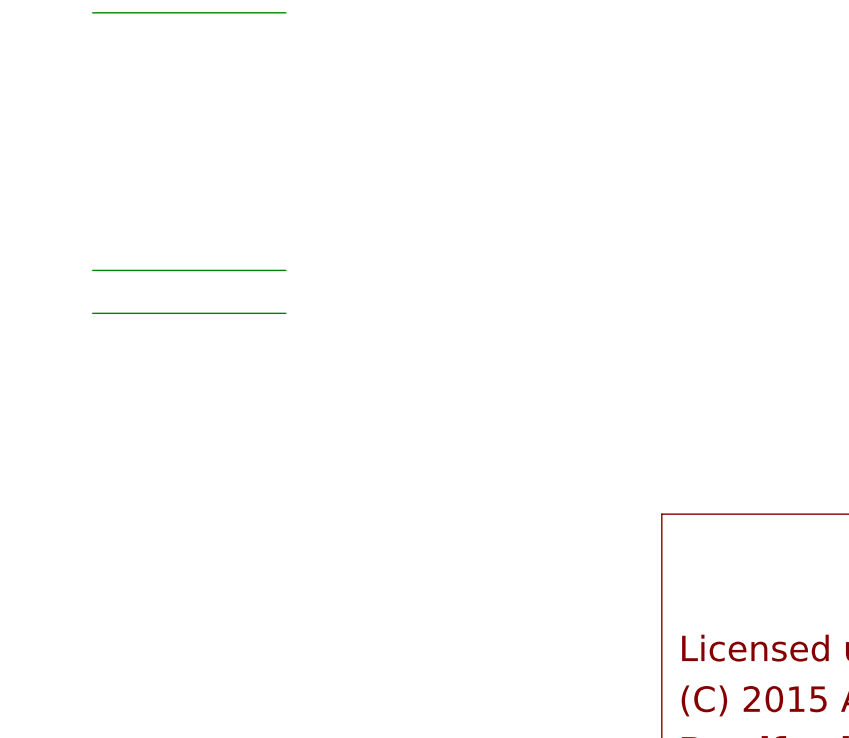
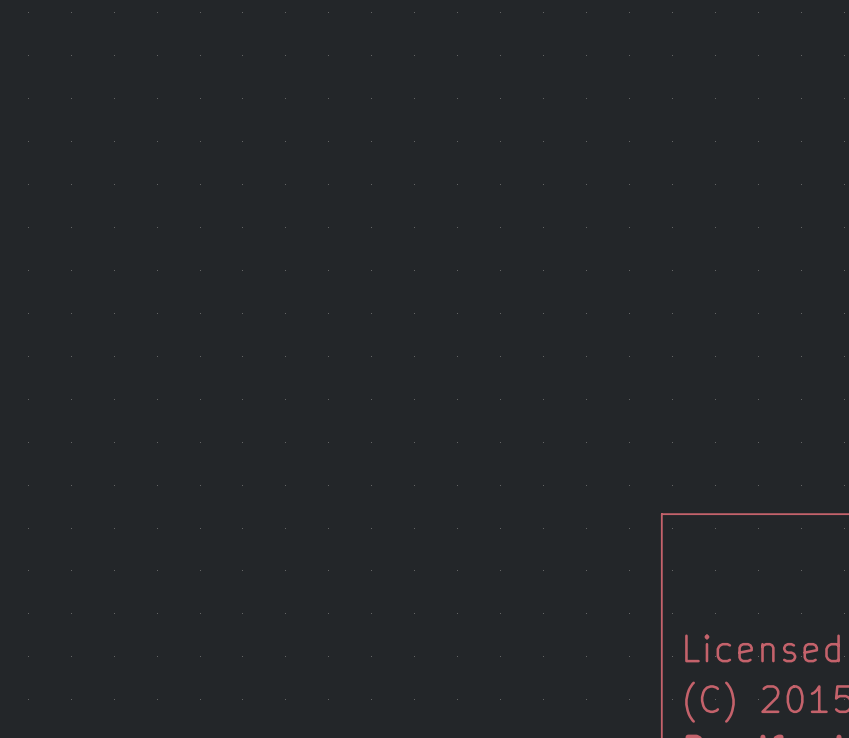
wire: (92, 12) (285, 12) -> none
wire: (92, 270) (285, 270) -> none
wire: (92, 313) (285, 313) -> none

